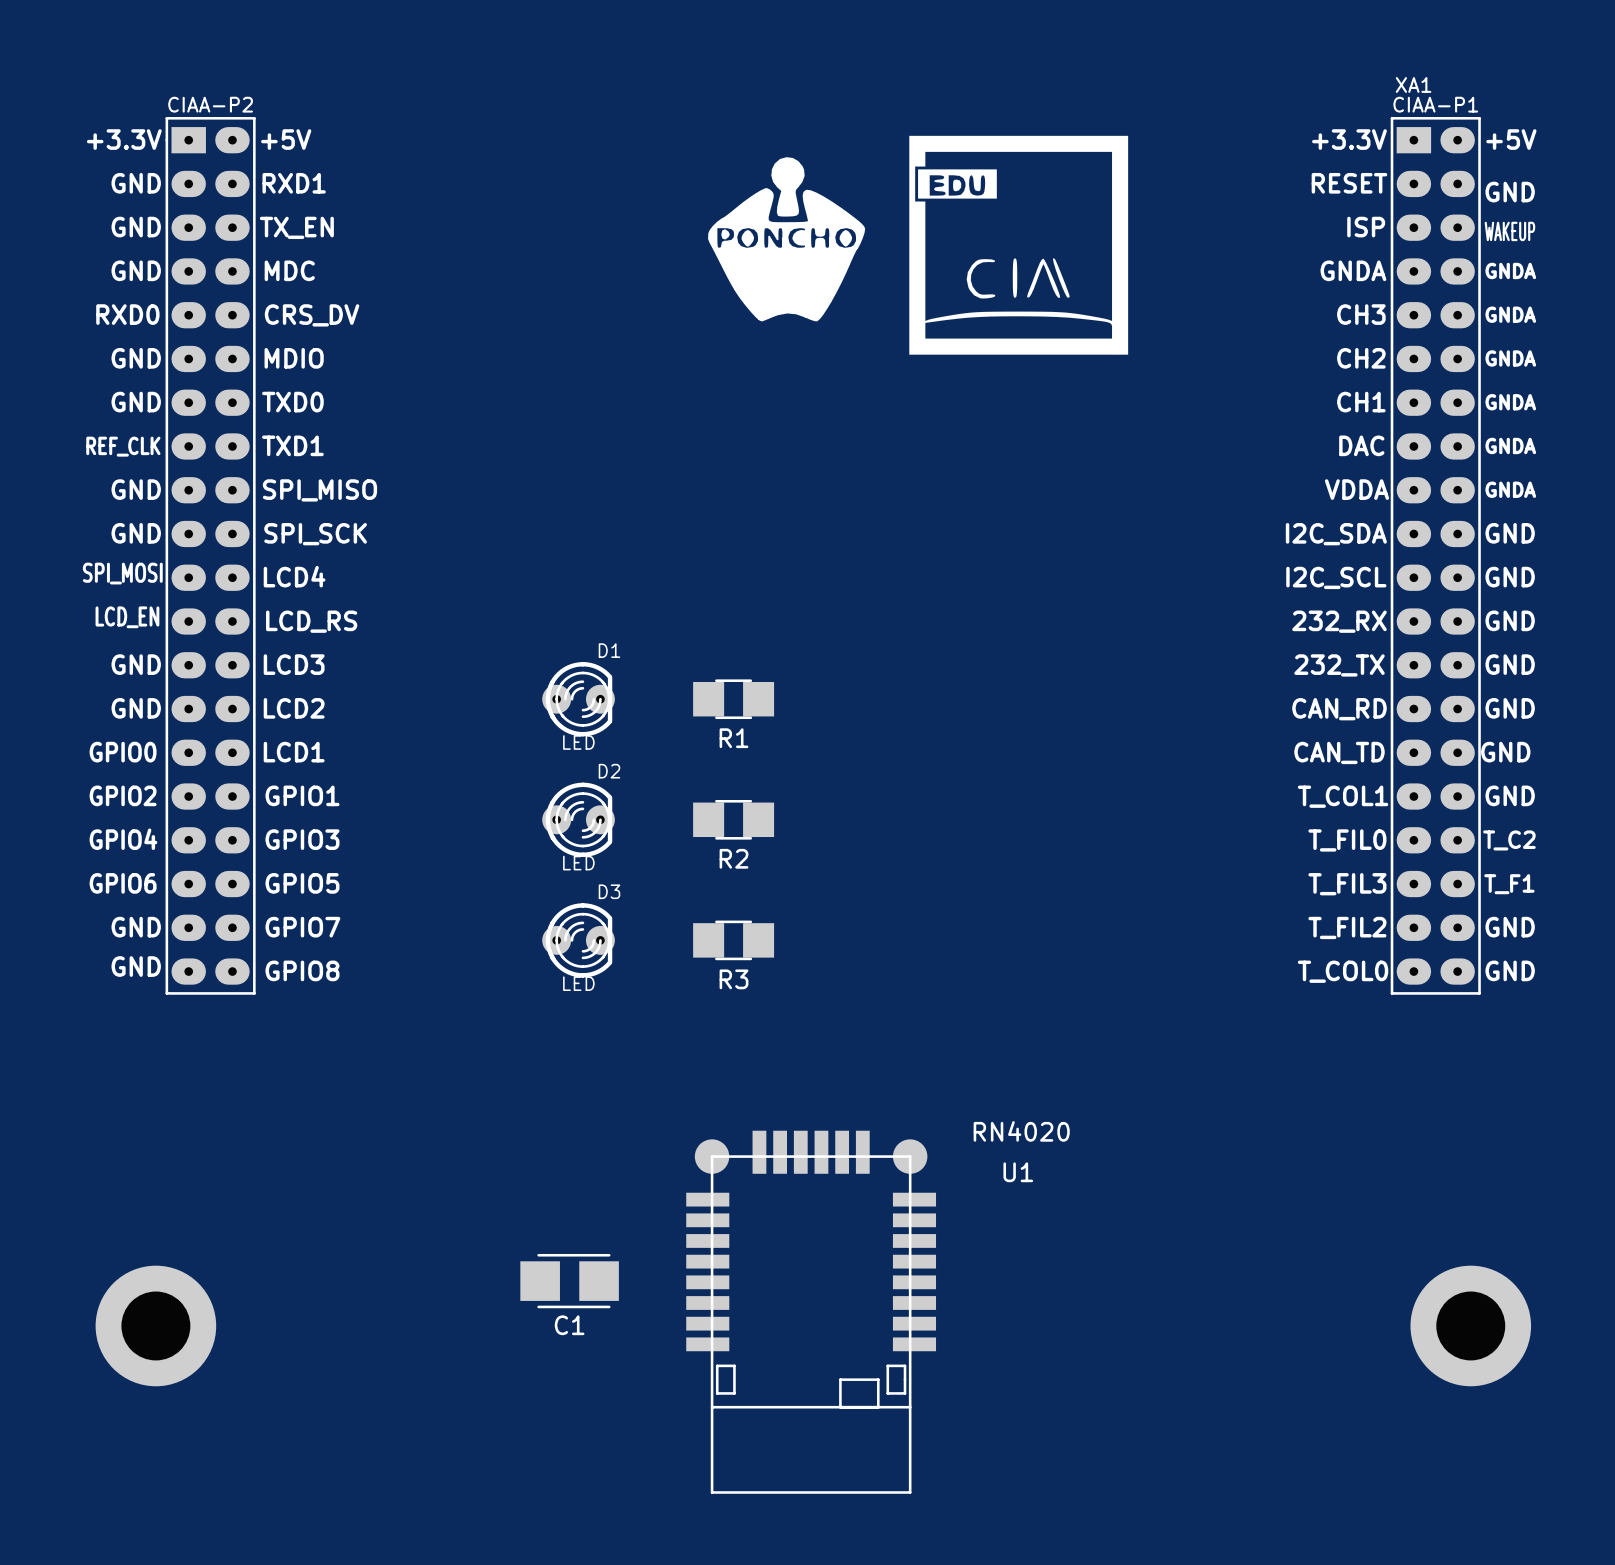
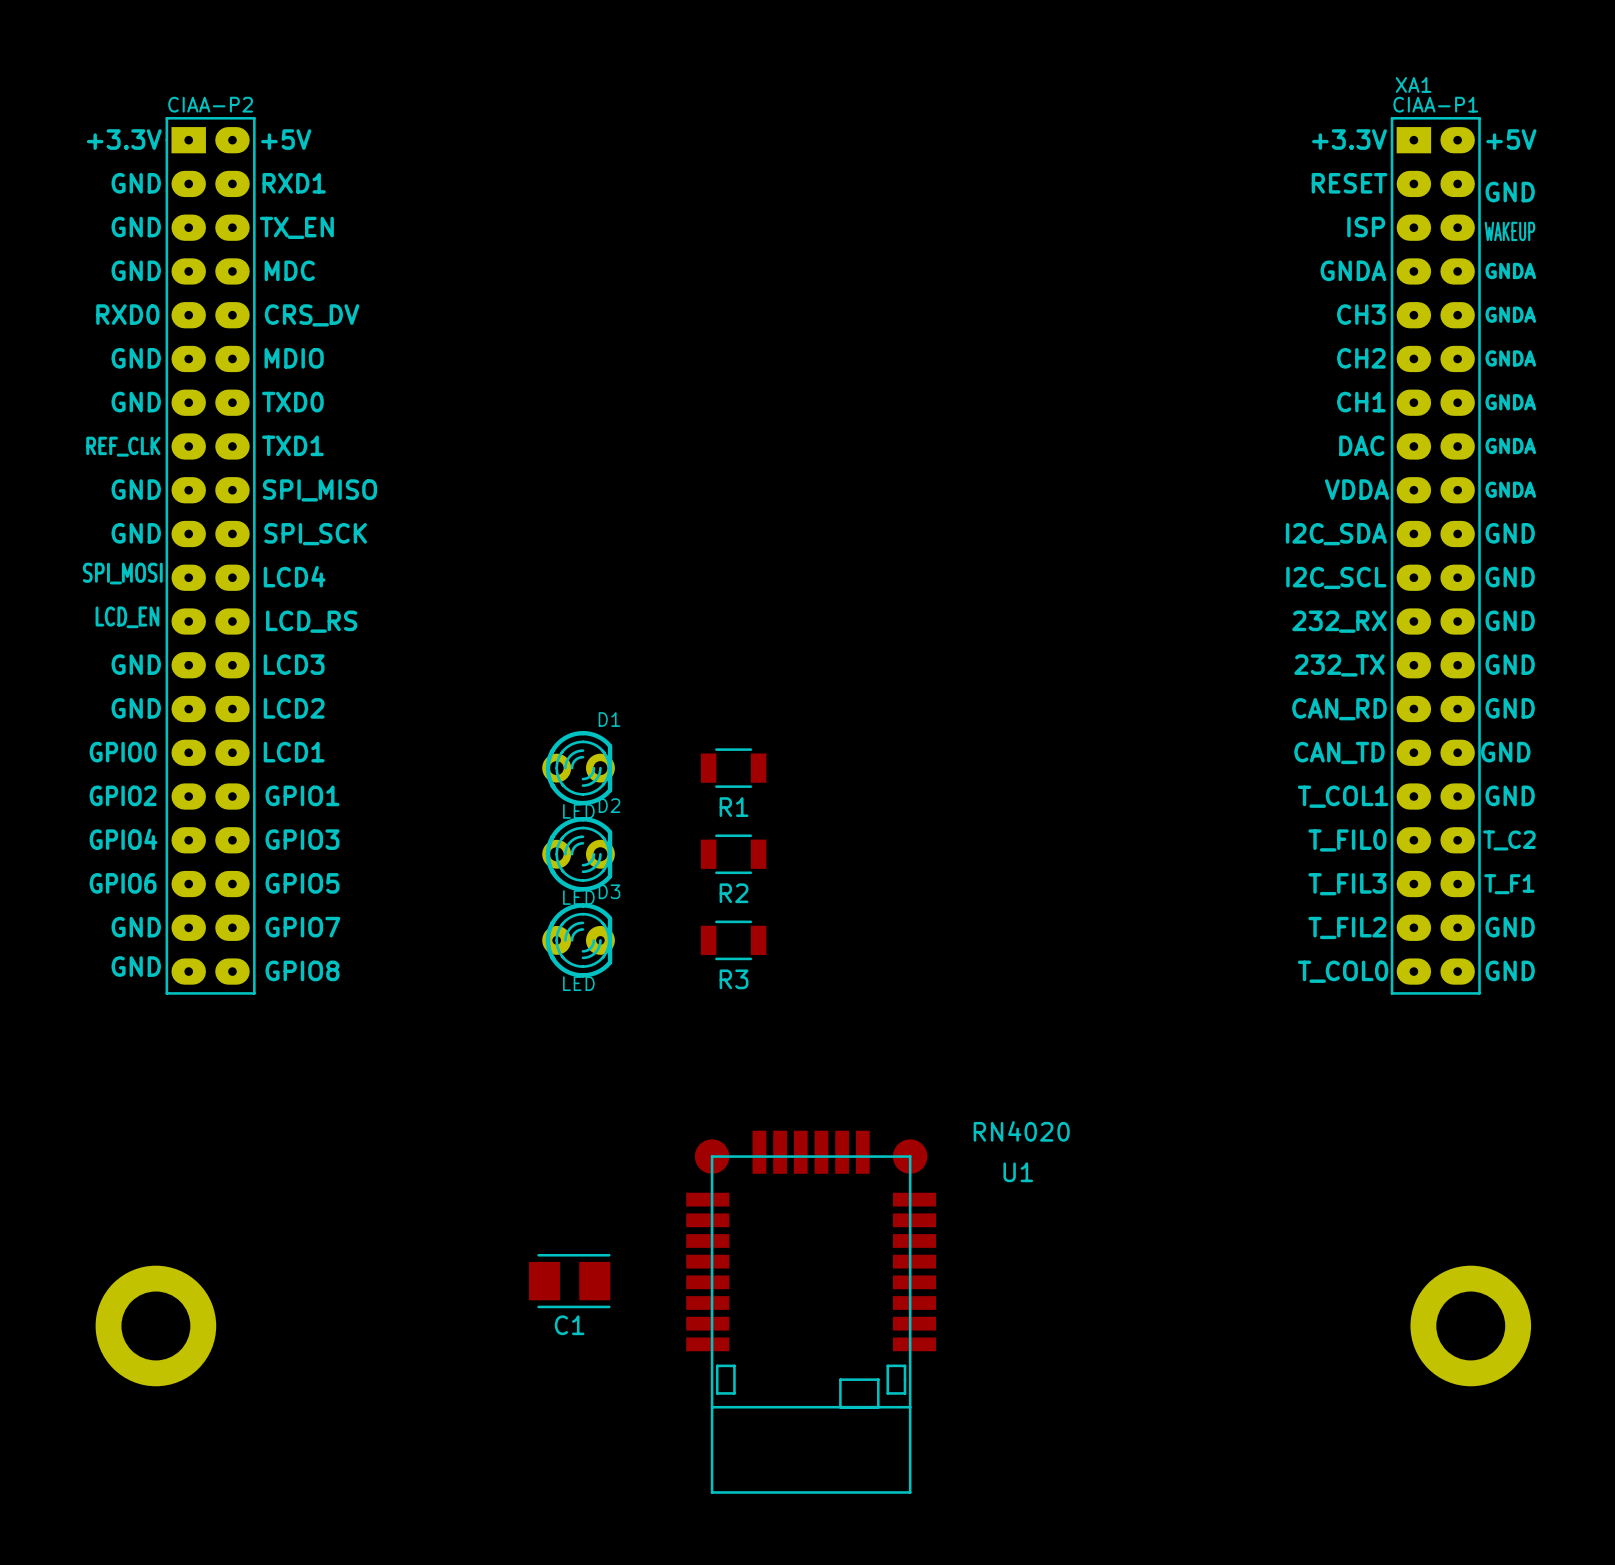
drawing: [909, 135, 1129, 355] -> none
drawing: [708, 157, 866, 322] -> none
D1 footprint: [542, 662, 615, 737] -> [542, 730, 615, 806]
R1 footprint: [693, 679, 775, 720] -> [700, 748, 767, 788]
D2 footprint: [542, 782, 615, 857] -> [542, 817, 615, 892]
R2 footprint: [693, 799, 775, 840] -> [700, 834, 767, 875]
R3 footprint: [693, 920, 775, 961] -> [700, 920, 767, 961]
C1 footprint: [520, 1253, 619, 1309] -> [528, 1253, 611, 1309]

